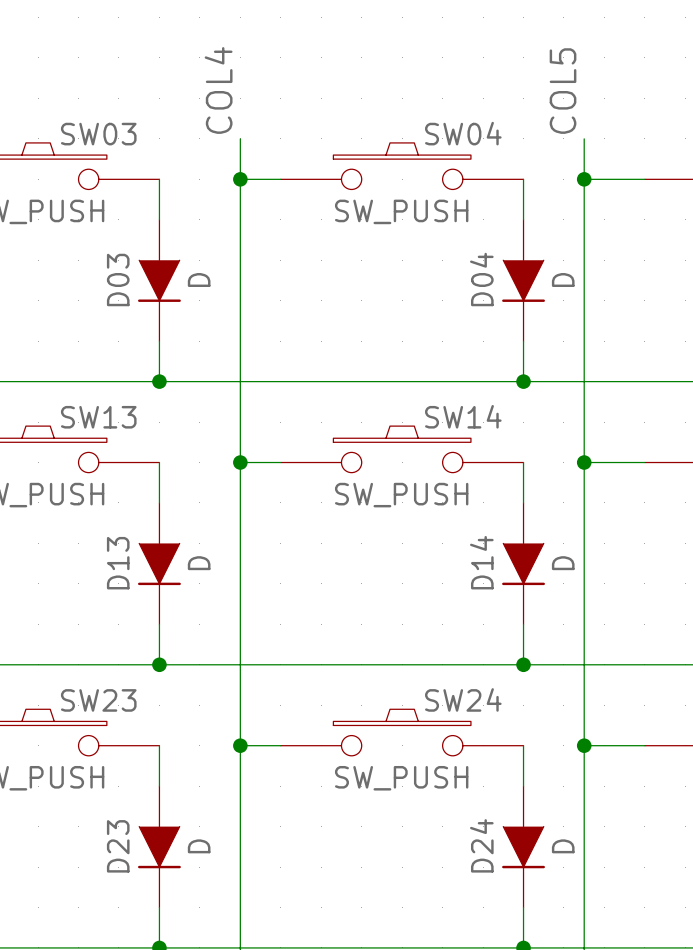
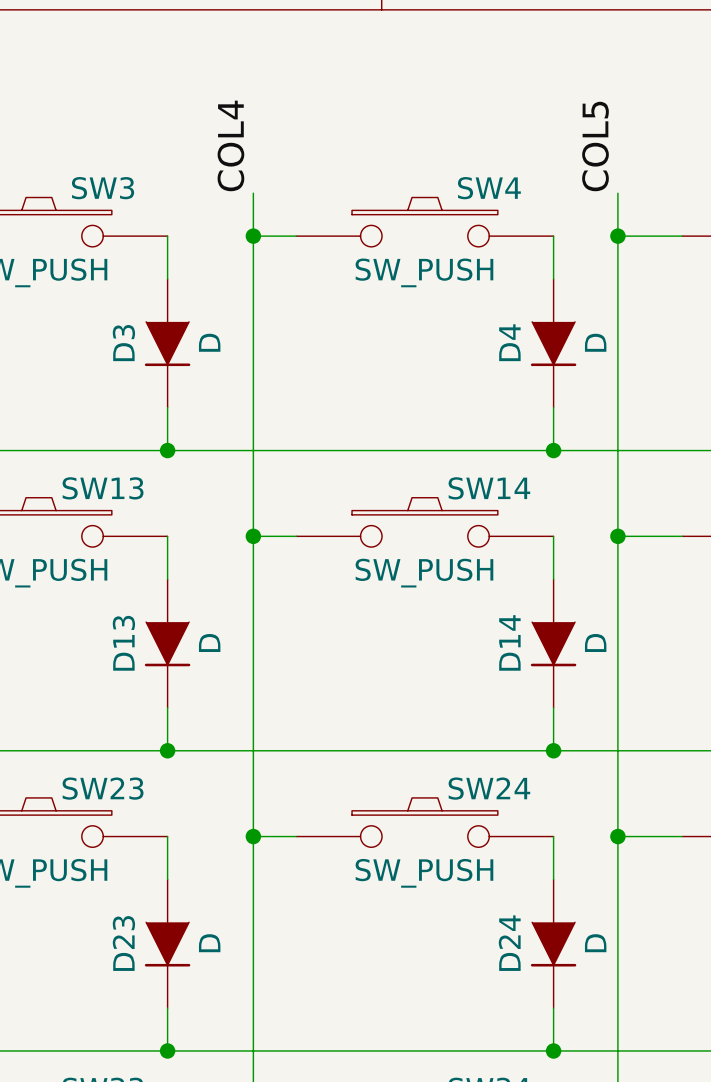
SW04 name: SW04 (463, 133) -> SW4 (489, 188)
SW03 name: SW03 (98, 134) -> SW3 (103, 188)
D03 name: D03 (118, 279) -> D3 (123, 343)
D04 name: D04 (481, 279) -> D4 (509, 342)

